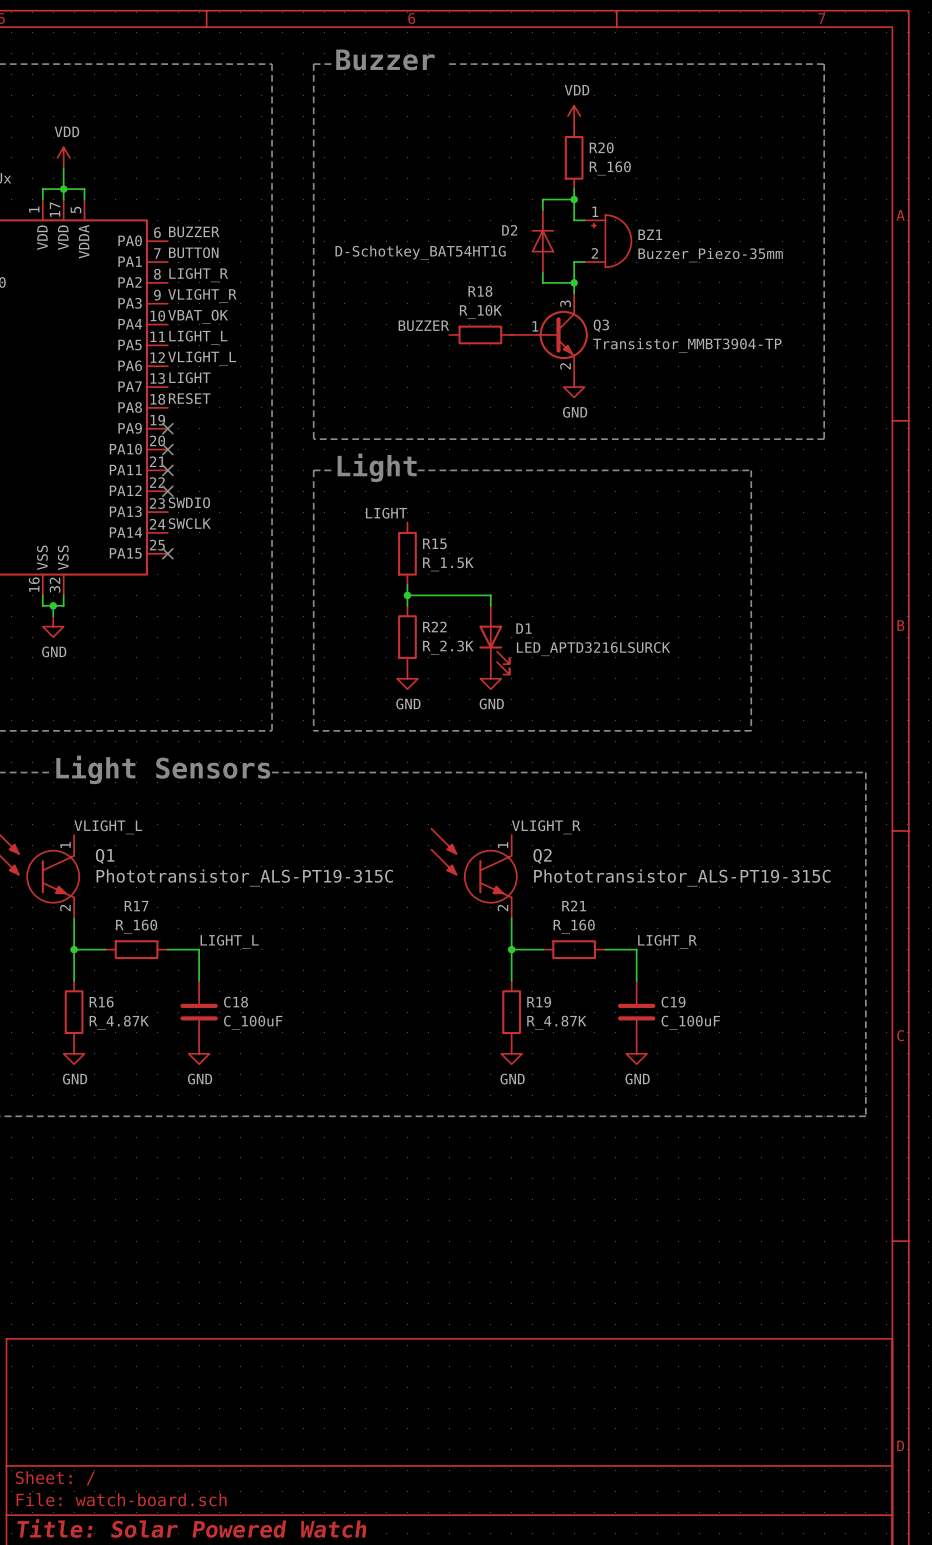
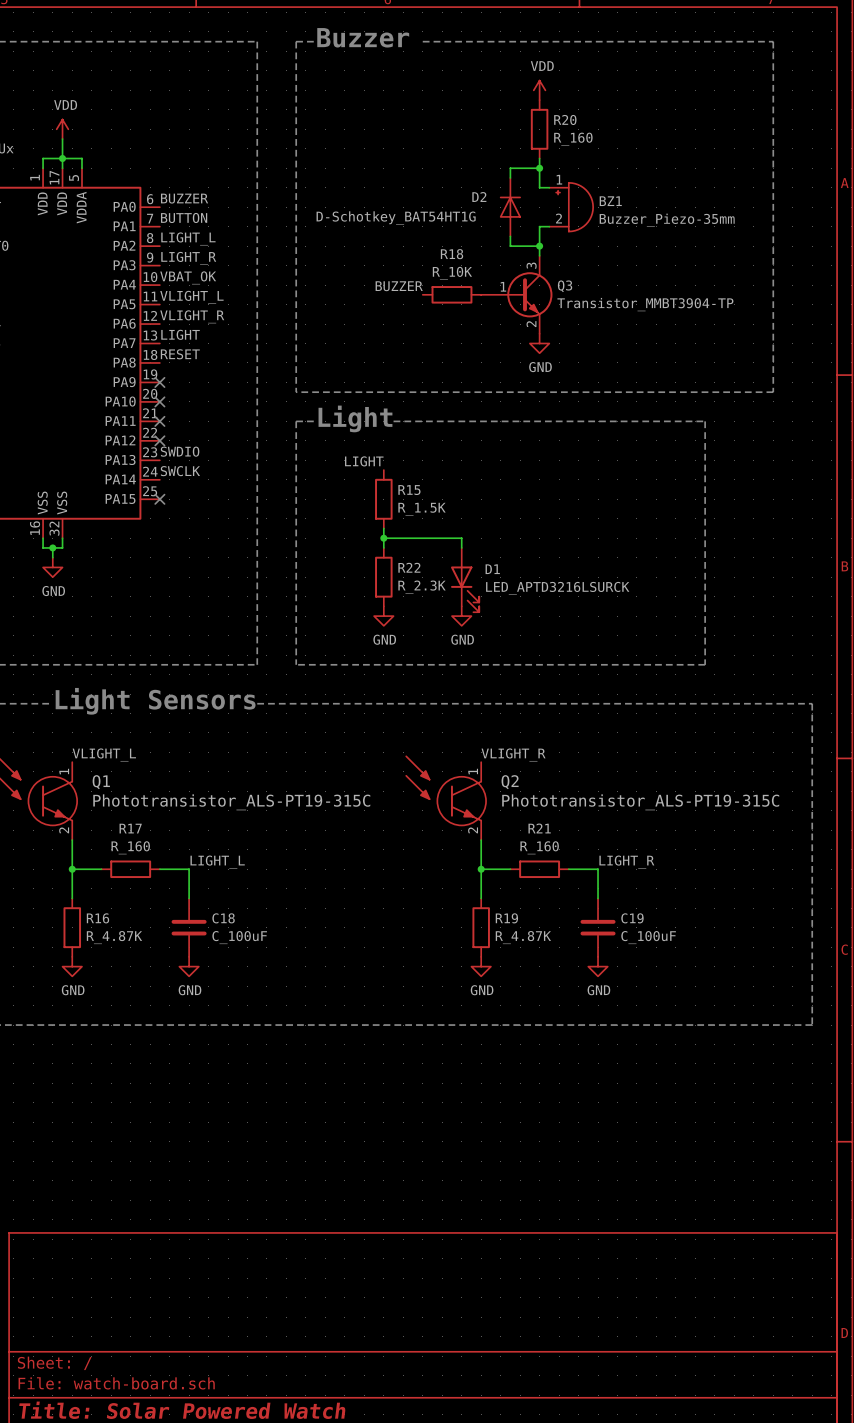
label: LIGHT_R (198, 275) -> LIGHT_L (188, 238)
label: VLIGHT_R (202, 296) -> LIGHT_R (188, 258)
label: LIGHT_L (198, 337) -> VLIGHT_L (191, 297)
label: VLIGHT_L (202, 358) -> VLIGHT_R (192, 316)

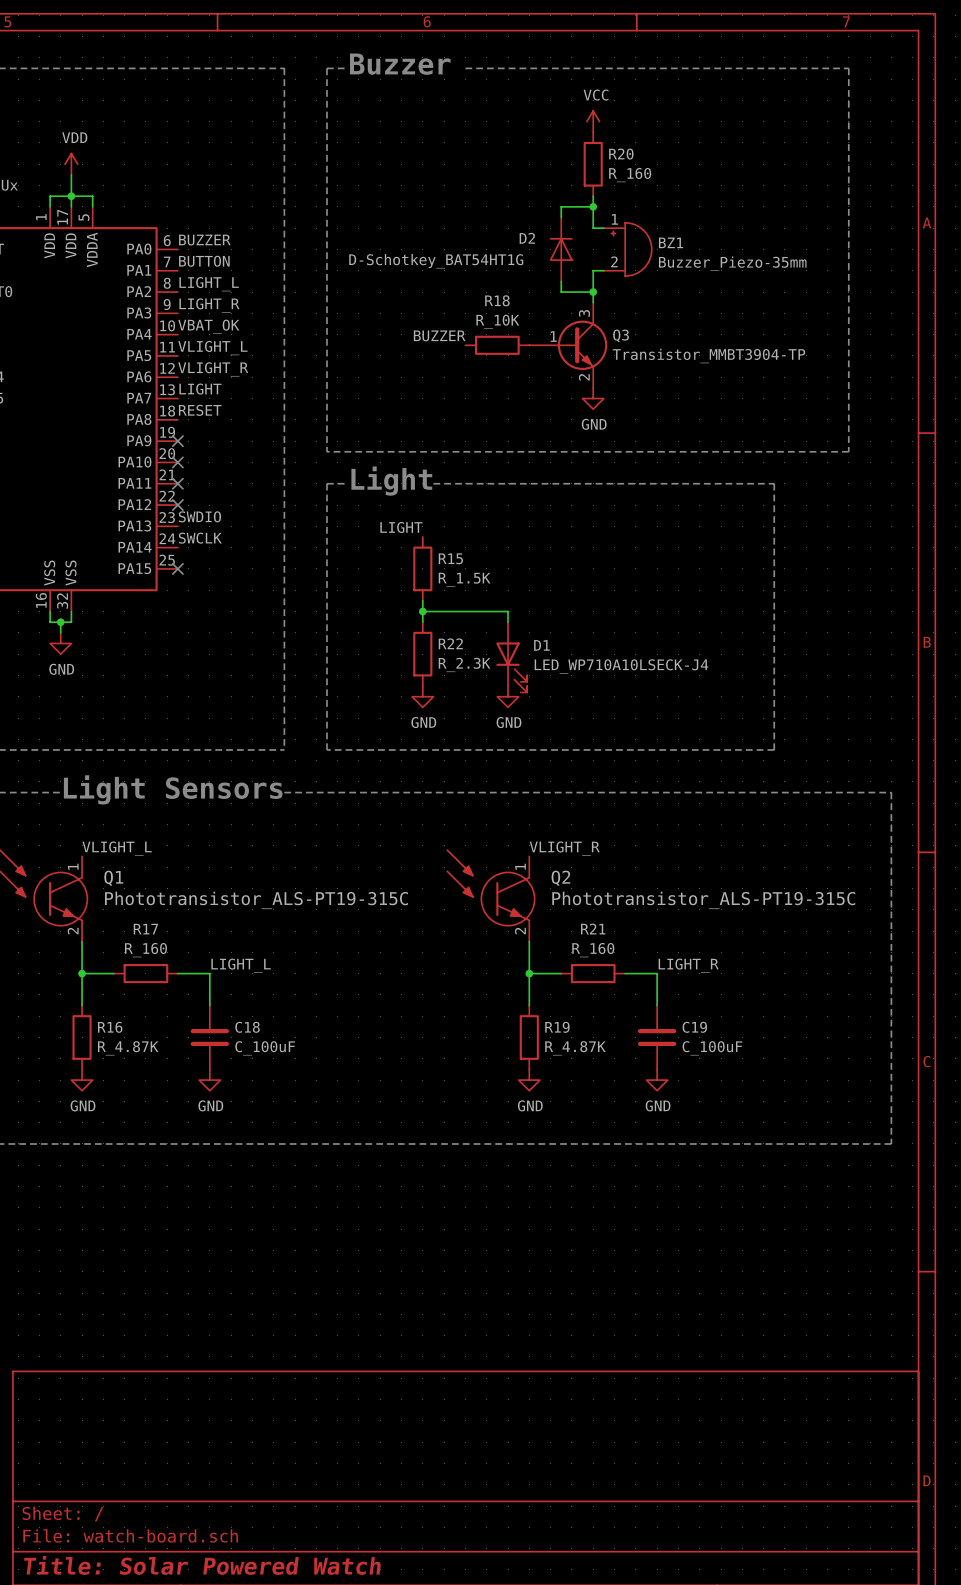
power symbol: VDD (539, 90) -> VCC (593, 121)
D1 value: LED_APTD3216LSURCK (557, 588) -> LED_WP710A10LSECK-J4 (621, 666)

